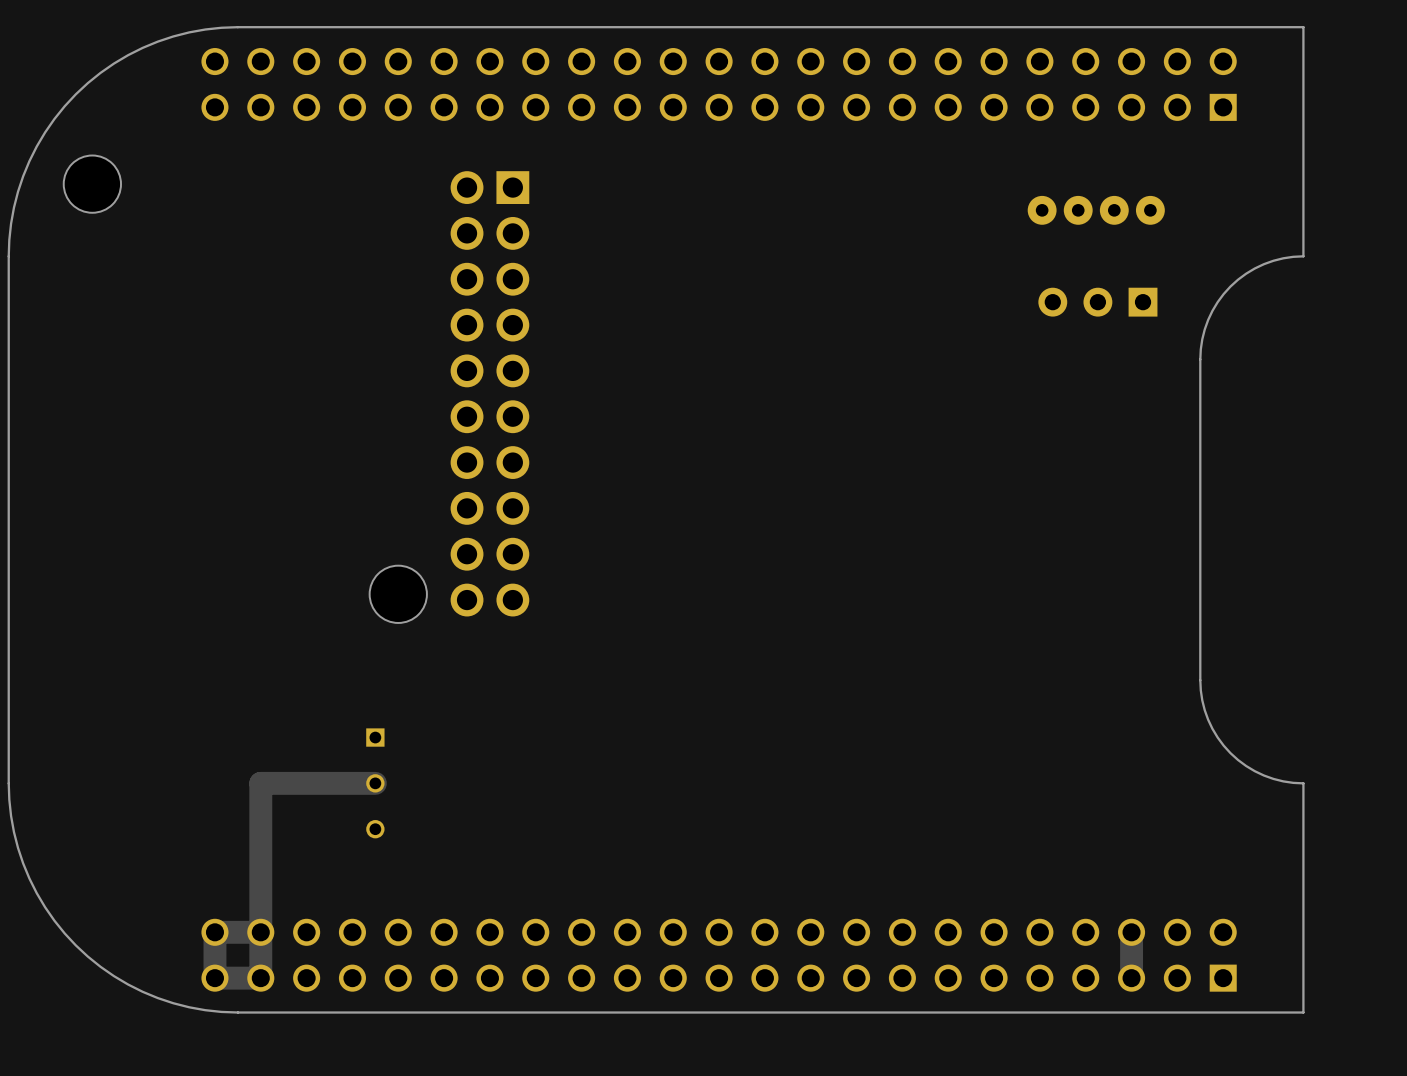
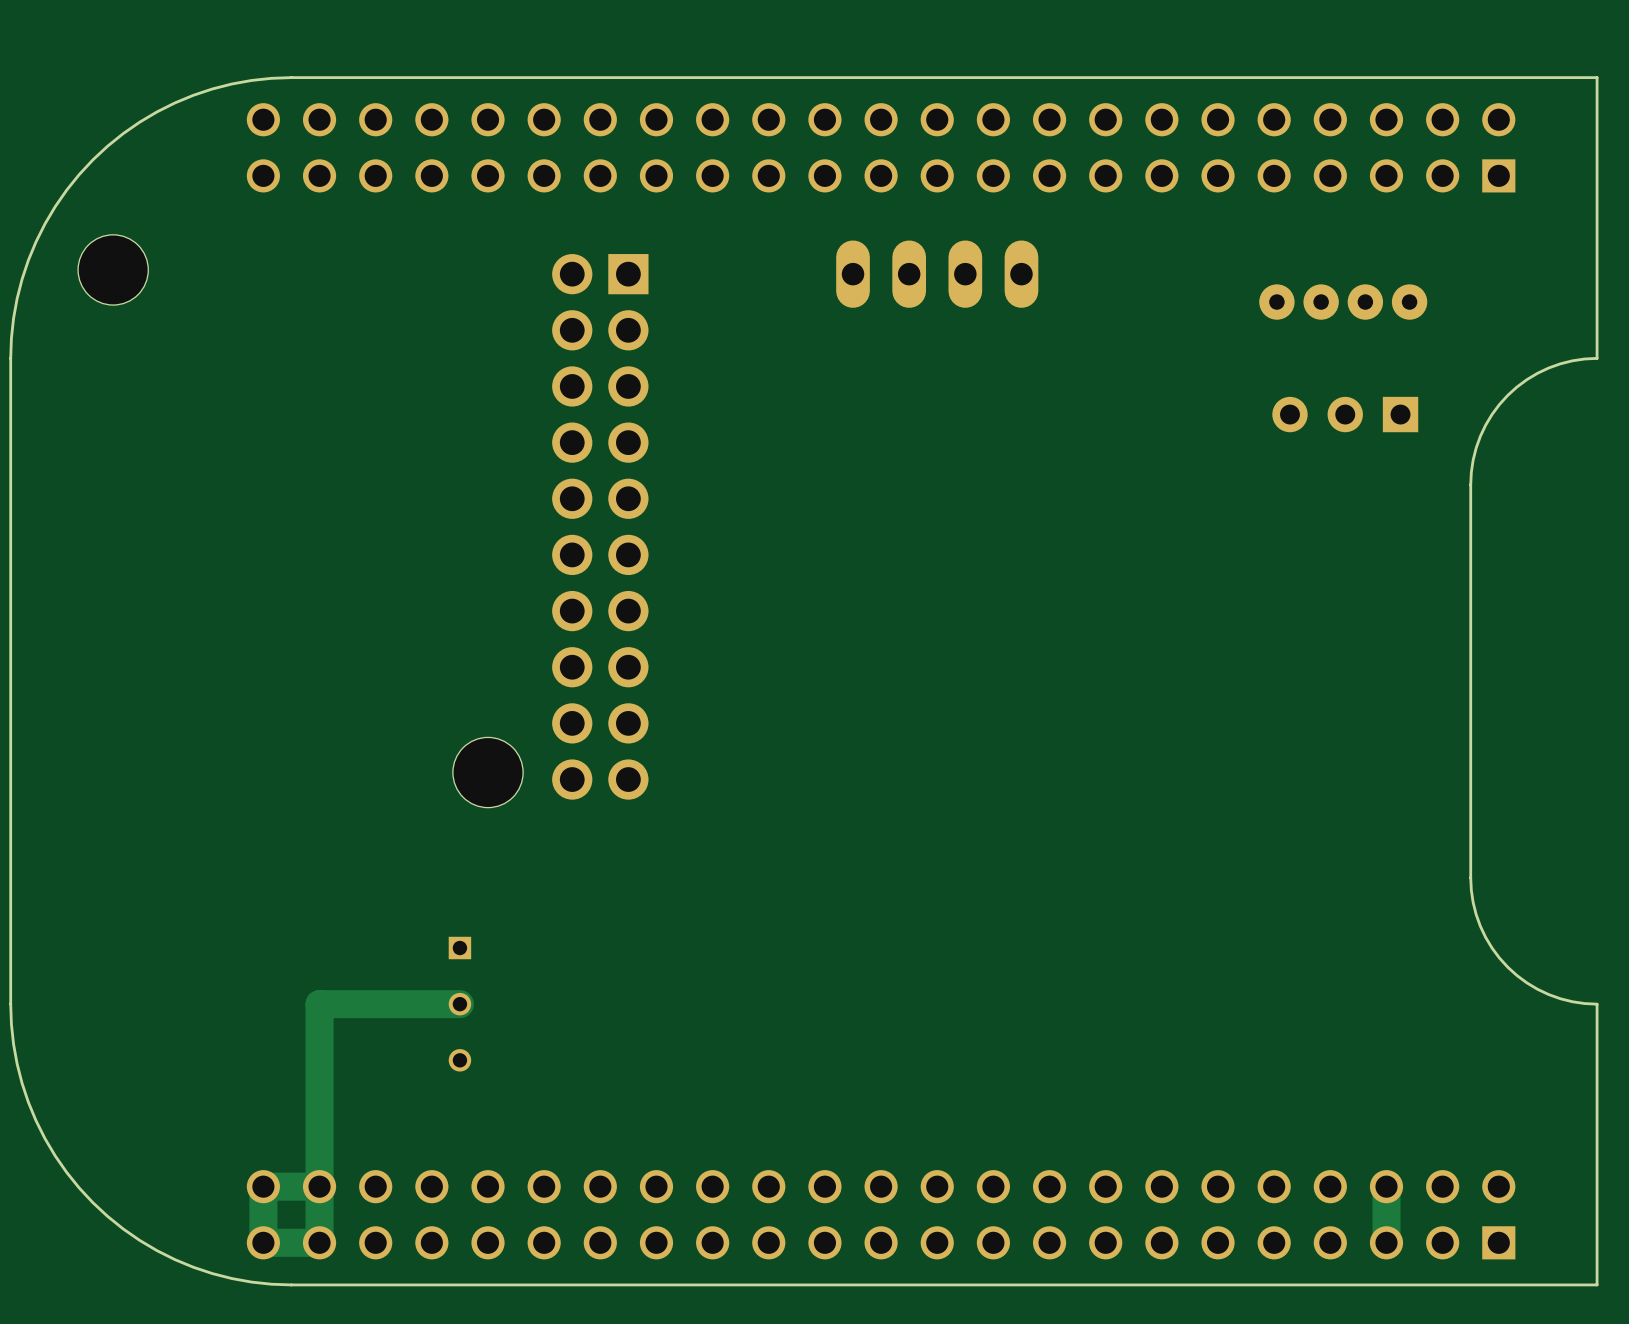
part: none -> (937, 274)

